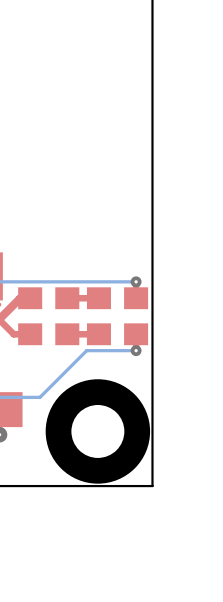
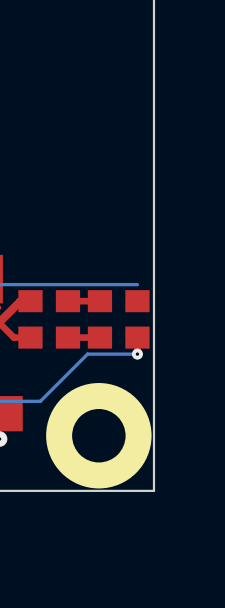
via: (136, 281) -> none

